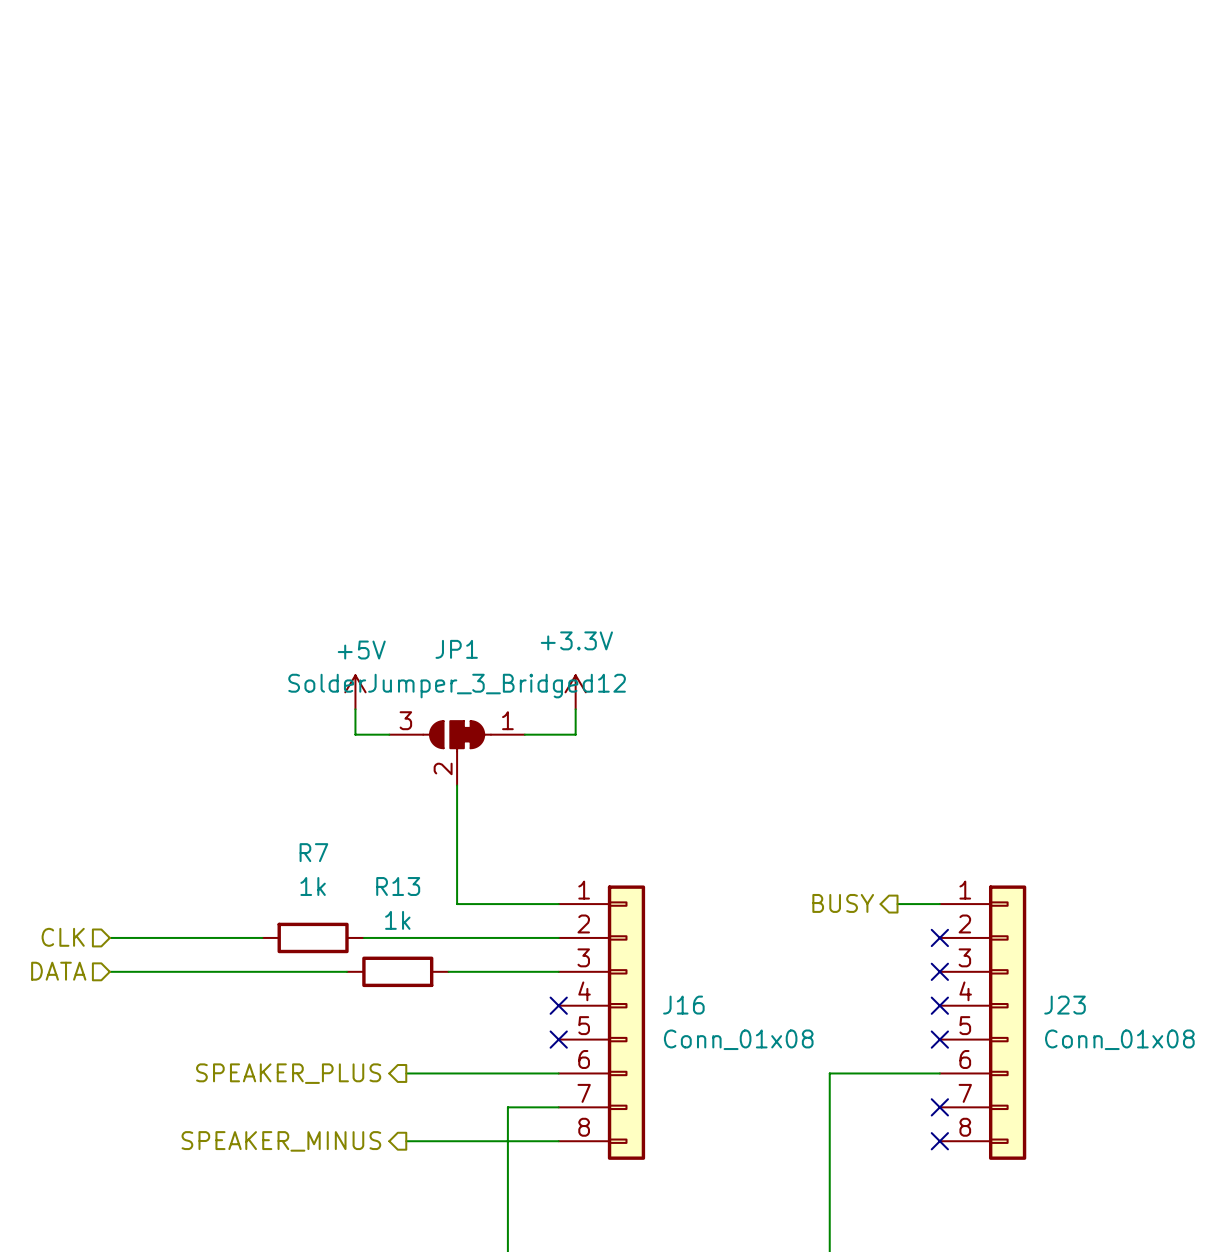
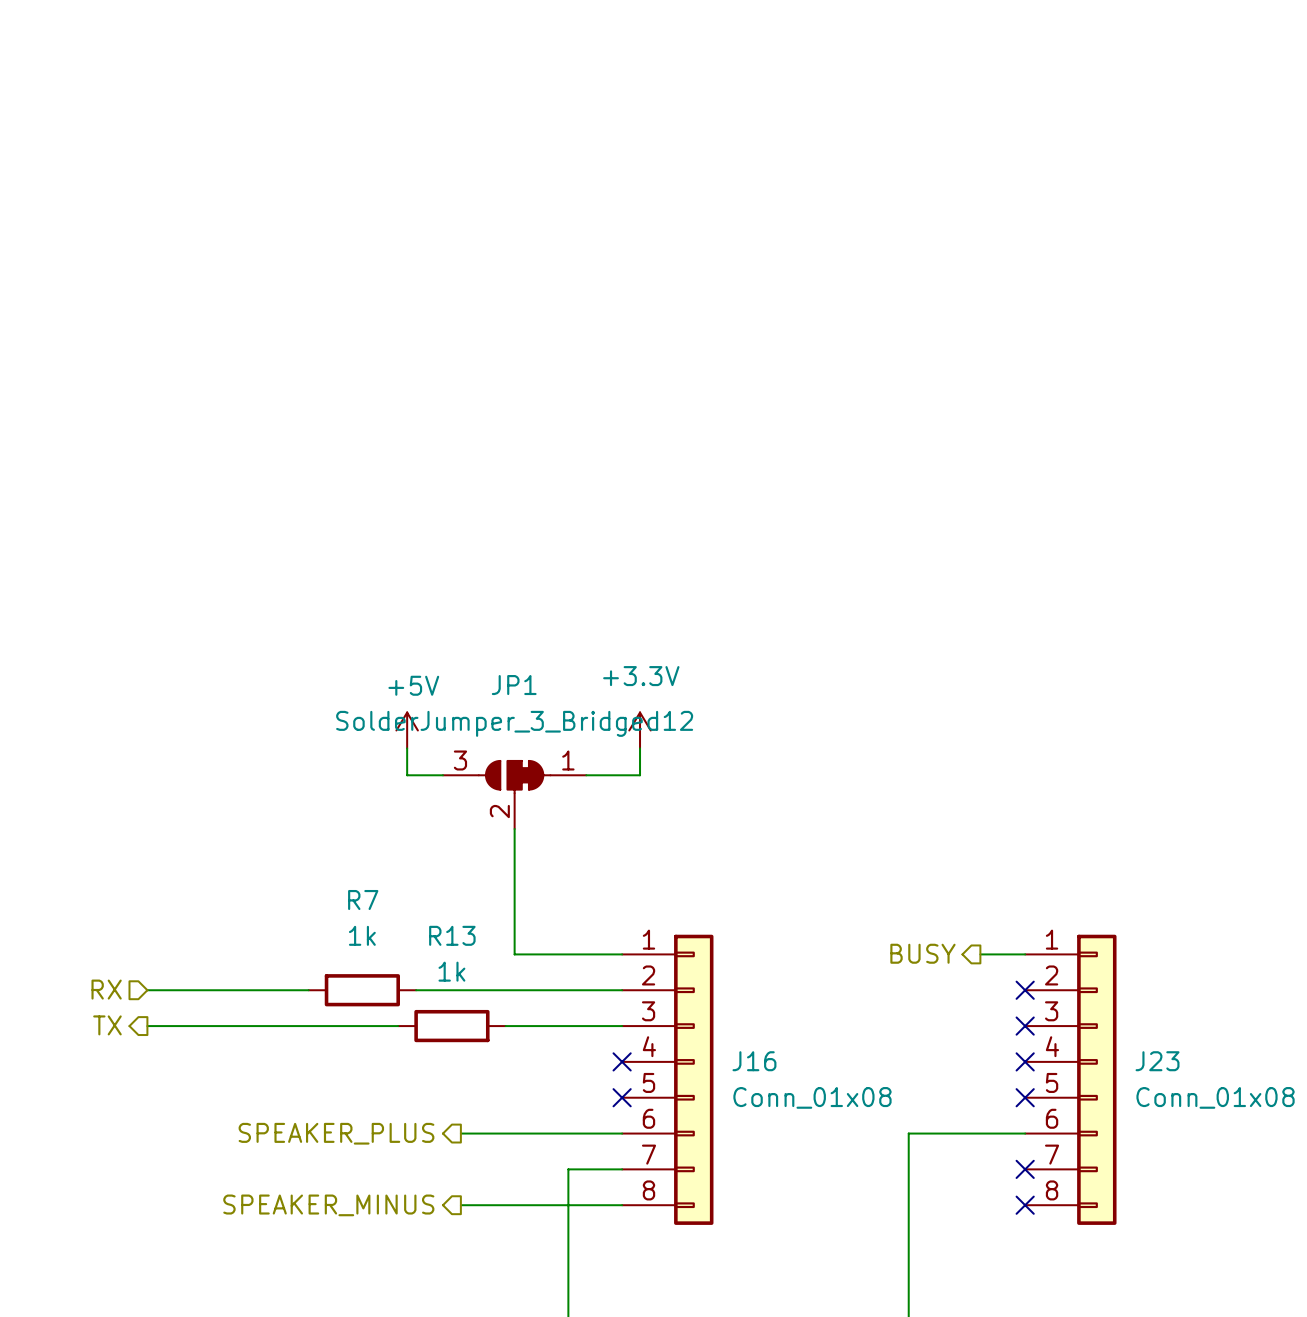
hierarchical label: CLK (63, 937) -> RX (106, 989)
hierarchical label shape: input (58, 971) -> output (107, 1025)
hierarchical label: DATA (58, 971) -> TX (107, 1025)

